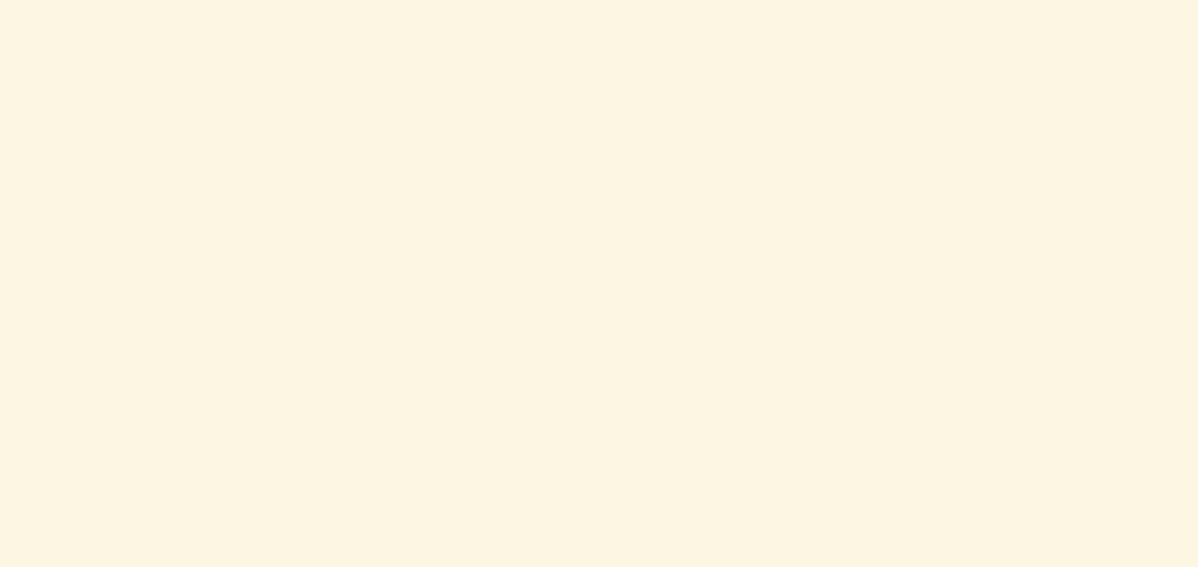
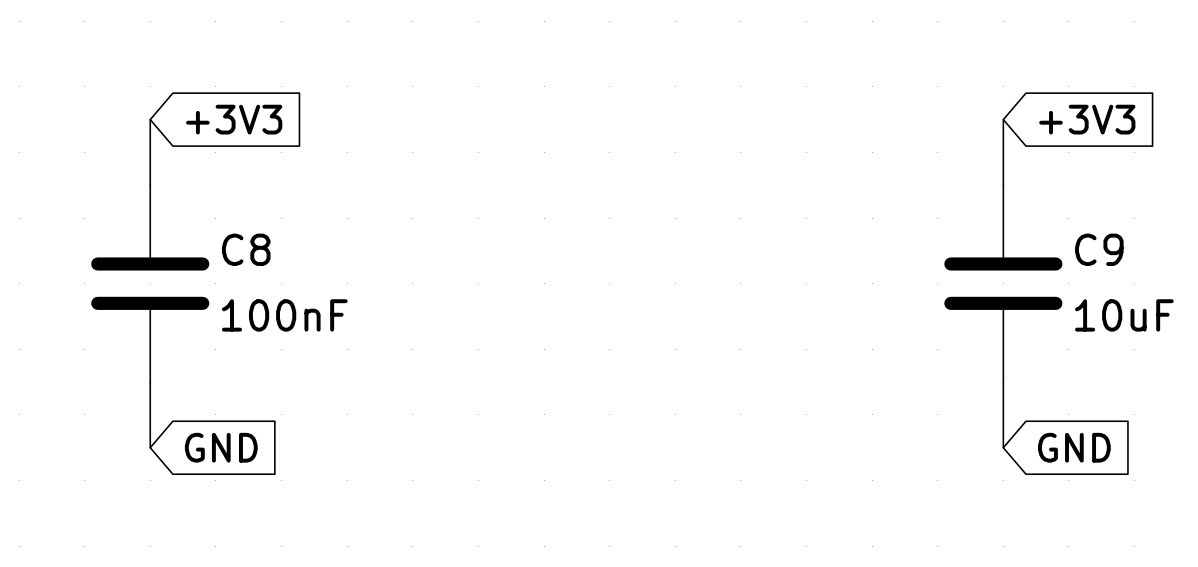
wire: none -> (150, 119) (150, 185)
global label: none -> +3V3 (234, 119)
wire: none -> (1003, 119) (1003, 185)
global label: none -> +3V3 (1087, 119)
C8: none -> 100nF (150, 283)
C9: none -> 10uF (1003, 283)
wire: none -> (150, 382) (150, 447)
wire: none -> (1003, 382) (1003, 447)
global label: none -> GND (221, 447)
global label: none -> GND (1074, 447)

